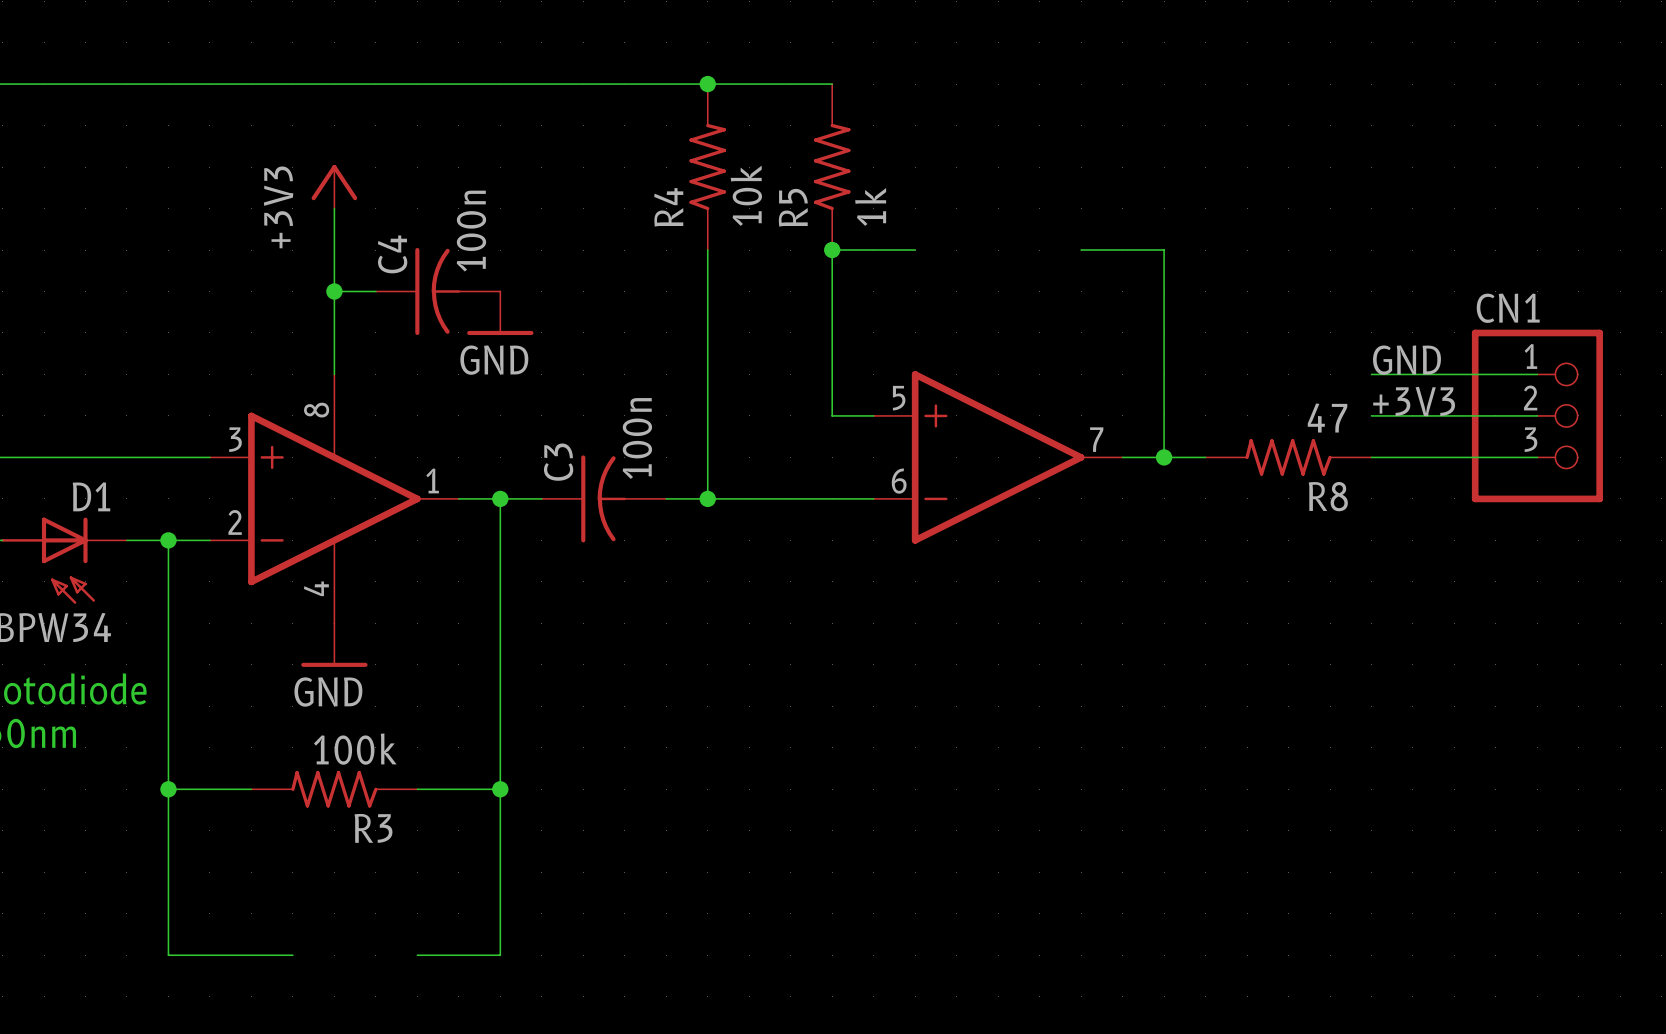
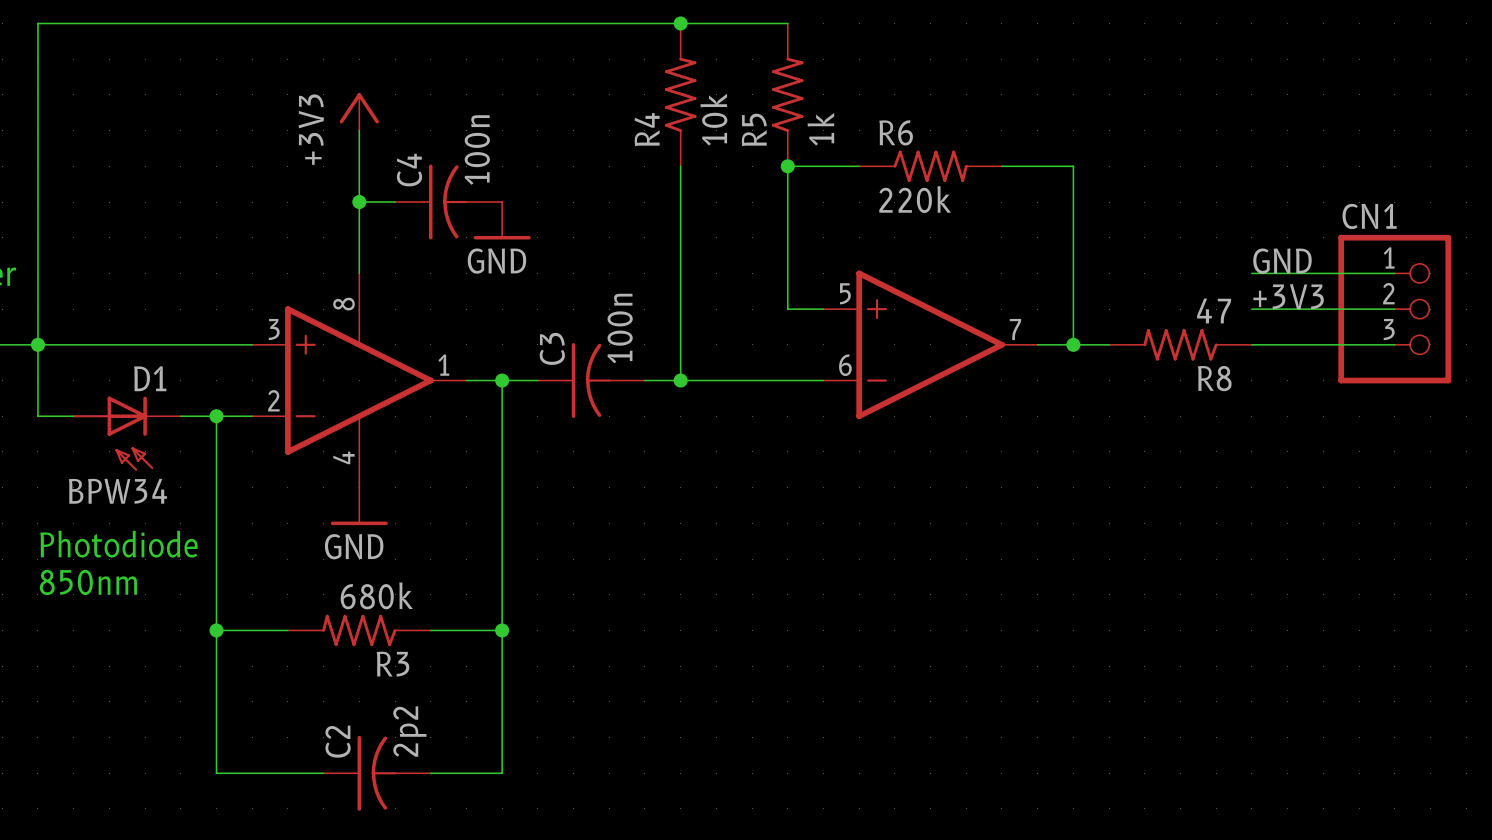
R6: none -> 220k (930, 166)
R3 value: 100k (355, 749) -> 680k (376, 595)
C2: none -> 2p2 (377, 773)

